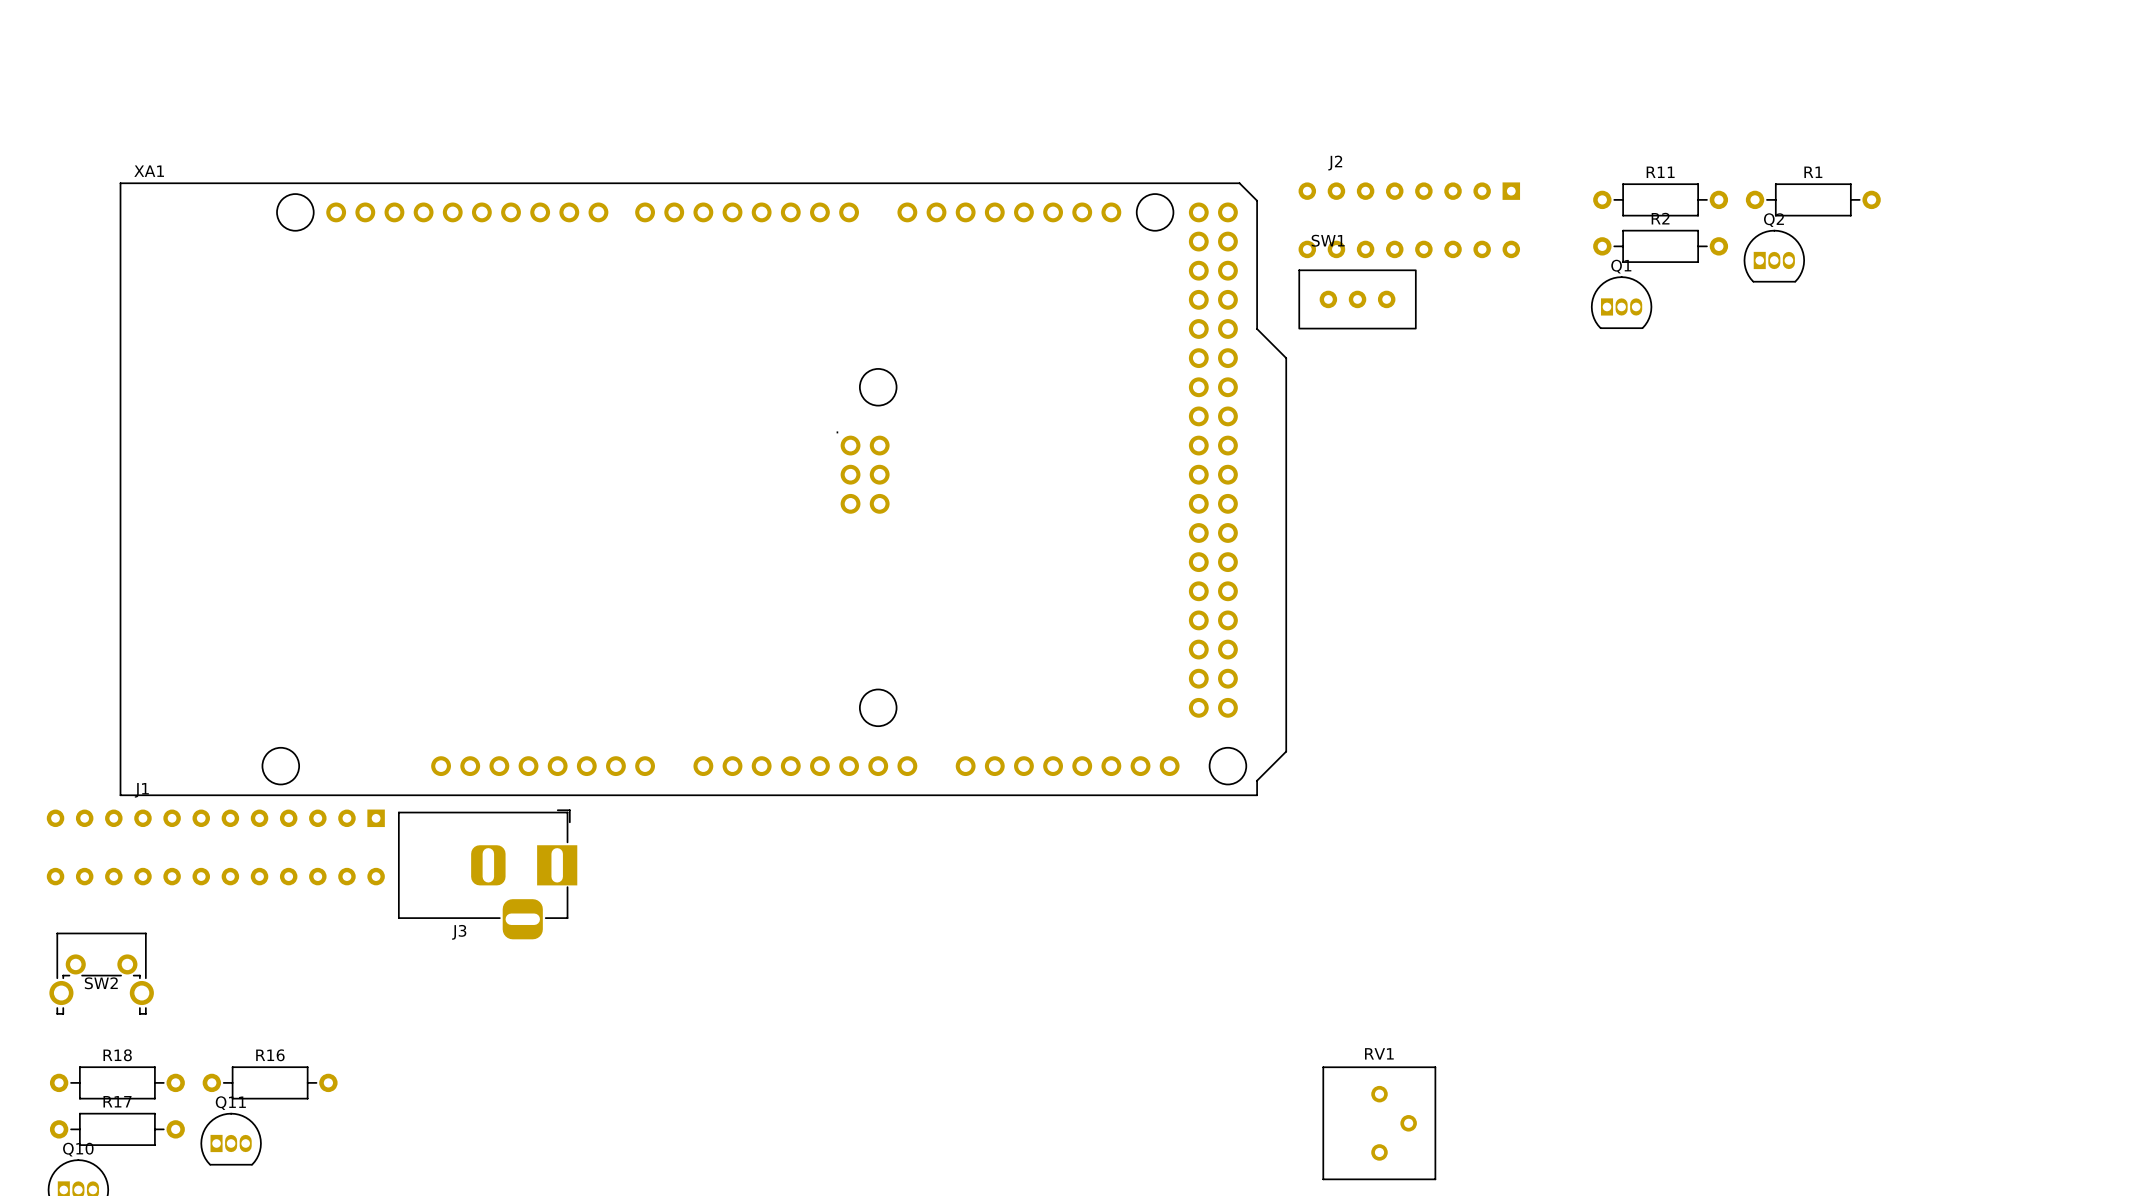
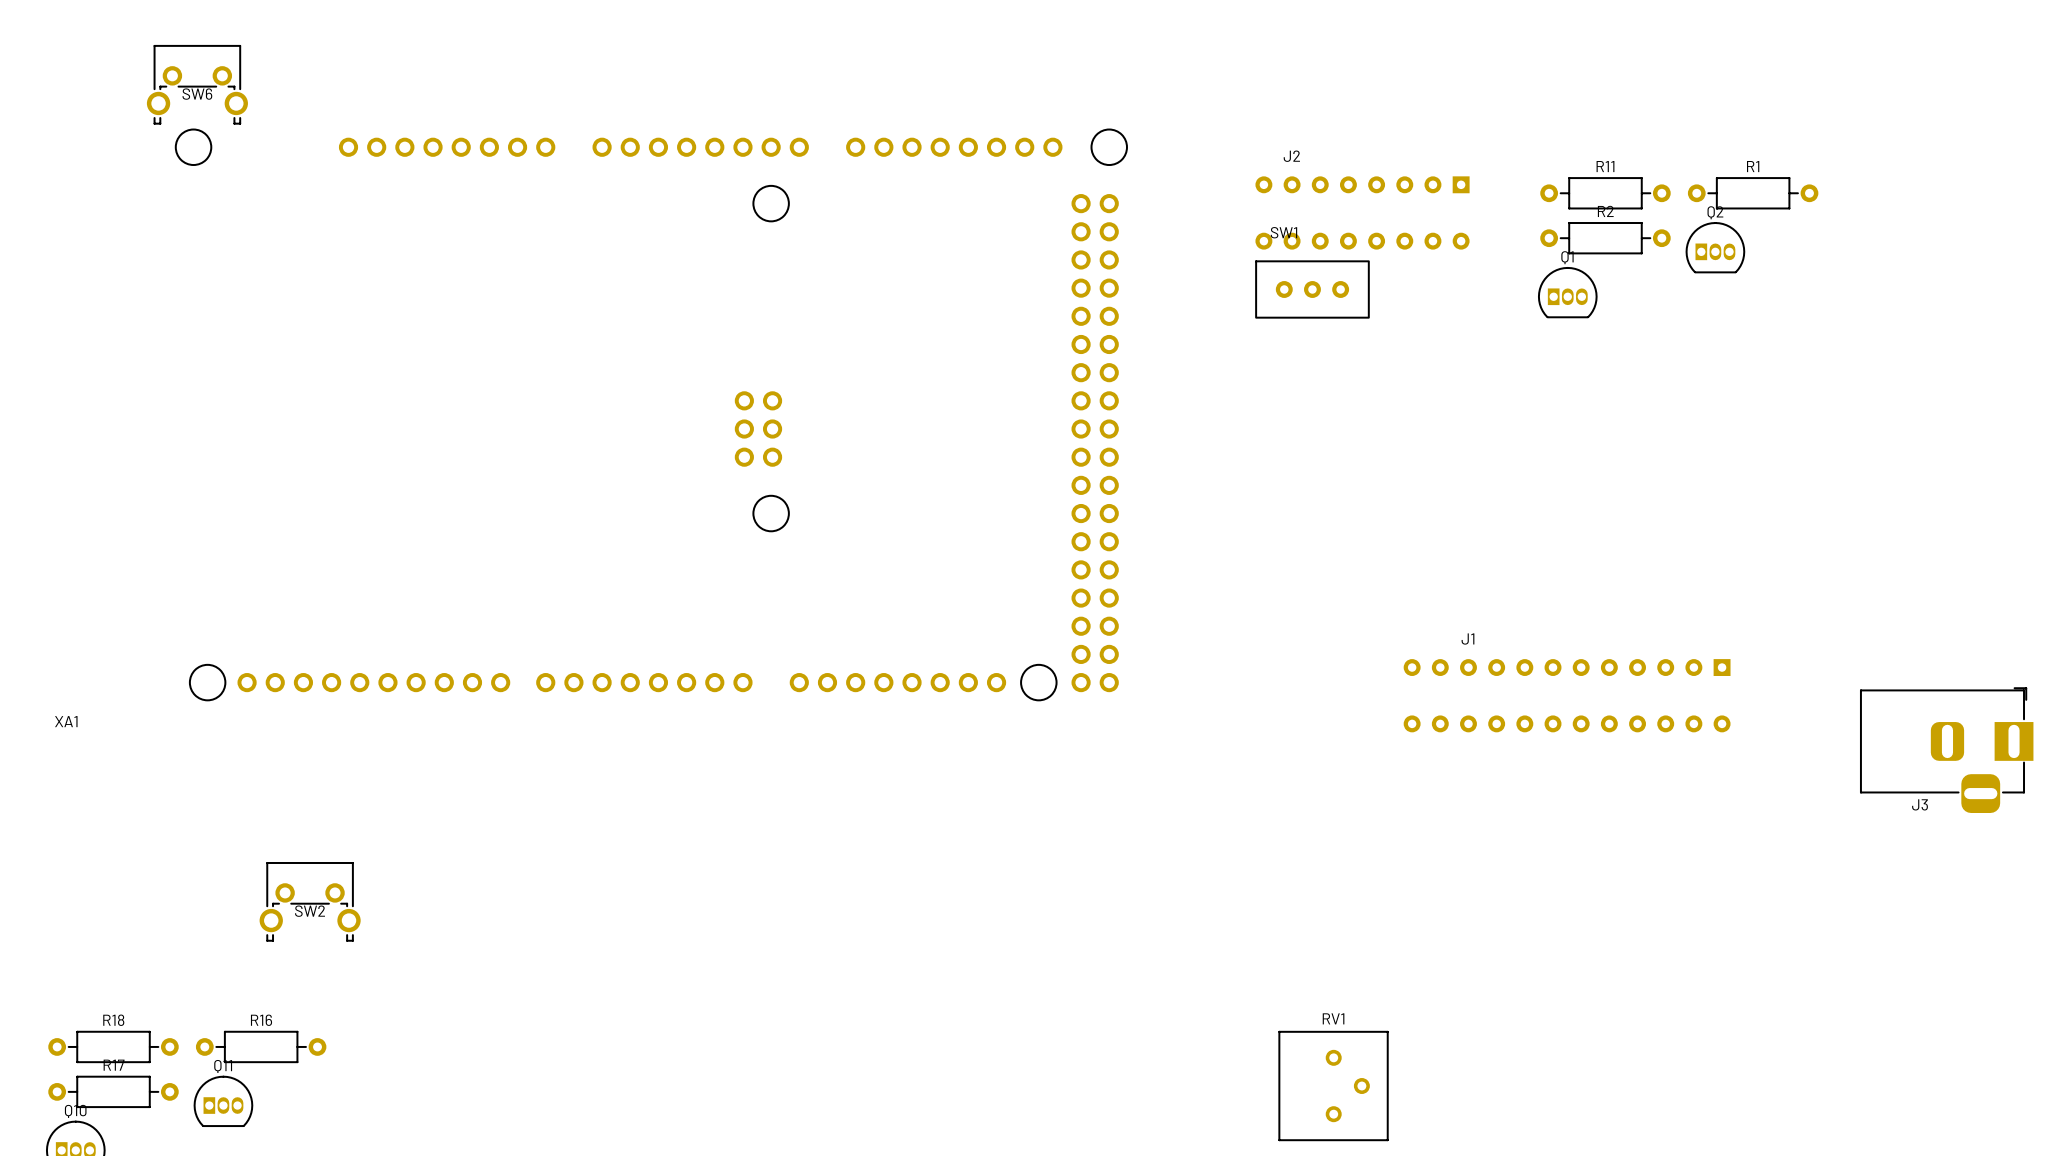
SW6: none -> (197, 84)
XA1 side: top (703, 489) -> bottom (651, 414)
J1 name position: J1 (141, 790) -> J1 (1467, 639)
J1 position: (215, 847) -> (1567, 695)
J3 position: (487, 874) -> (1946, 750)
SW2 position: (101, 973) -> (310, 901)

